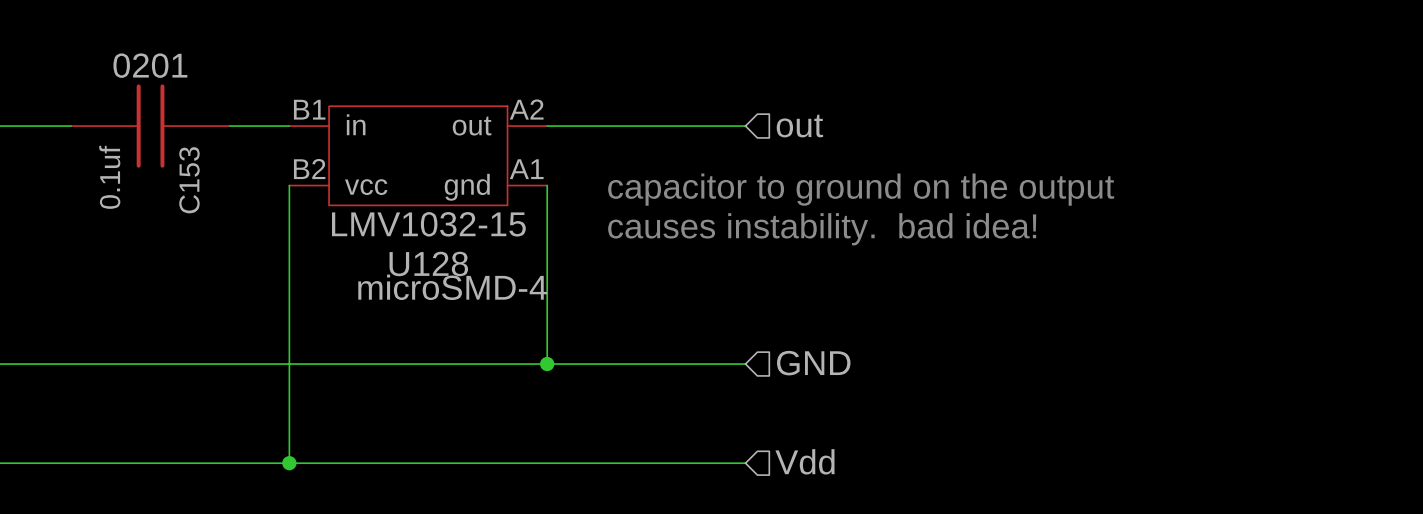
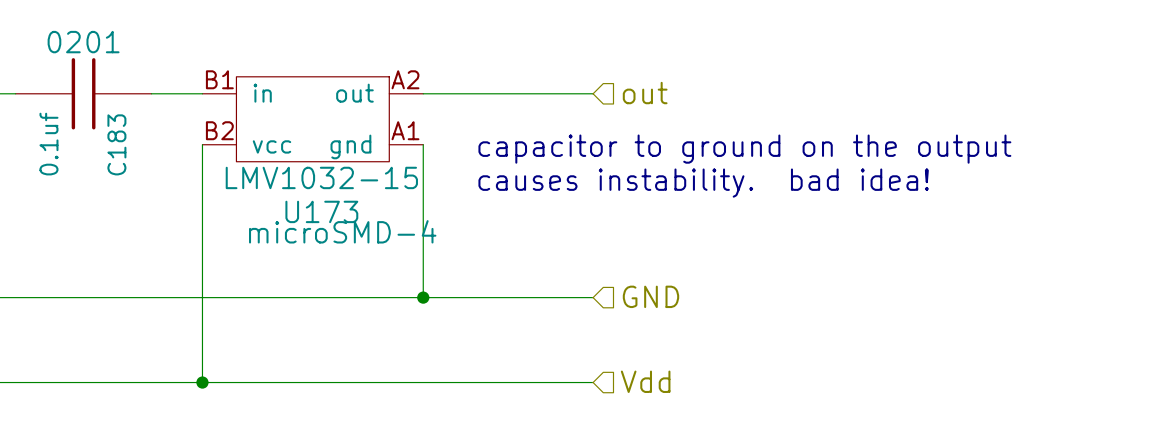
C153 name: C153 (189, 180) -> C183 (116, 144)
U128 name: U128 (428, 263) -> U173 (321, 211)

